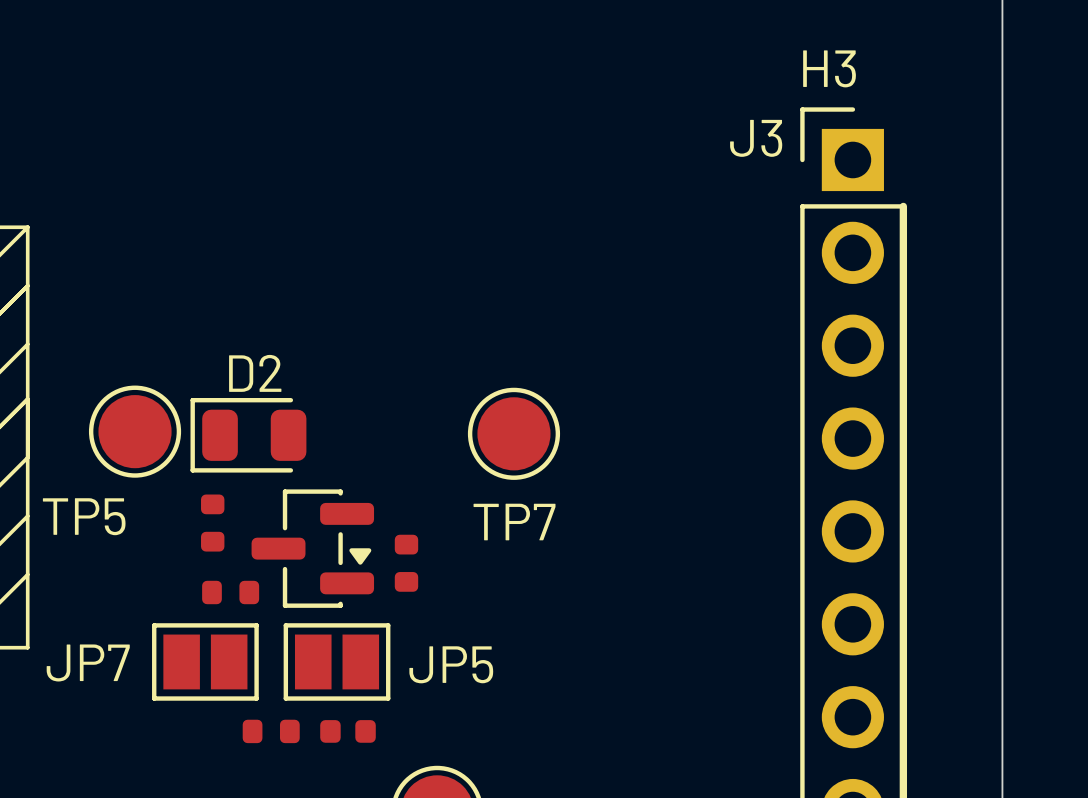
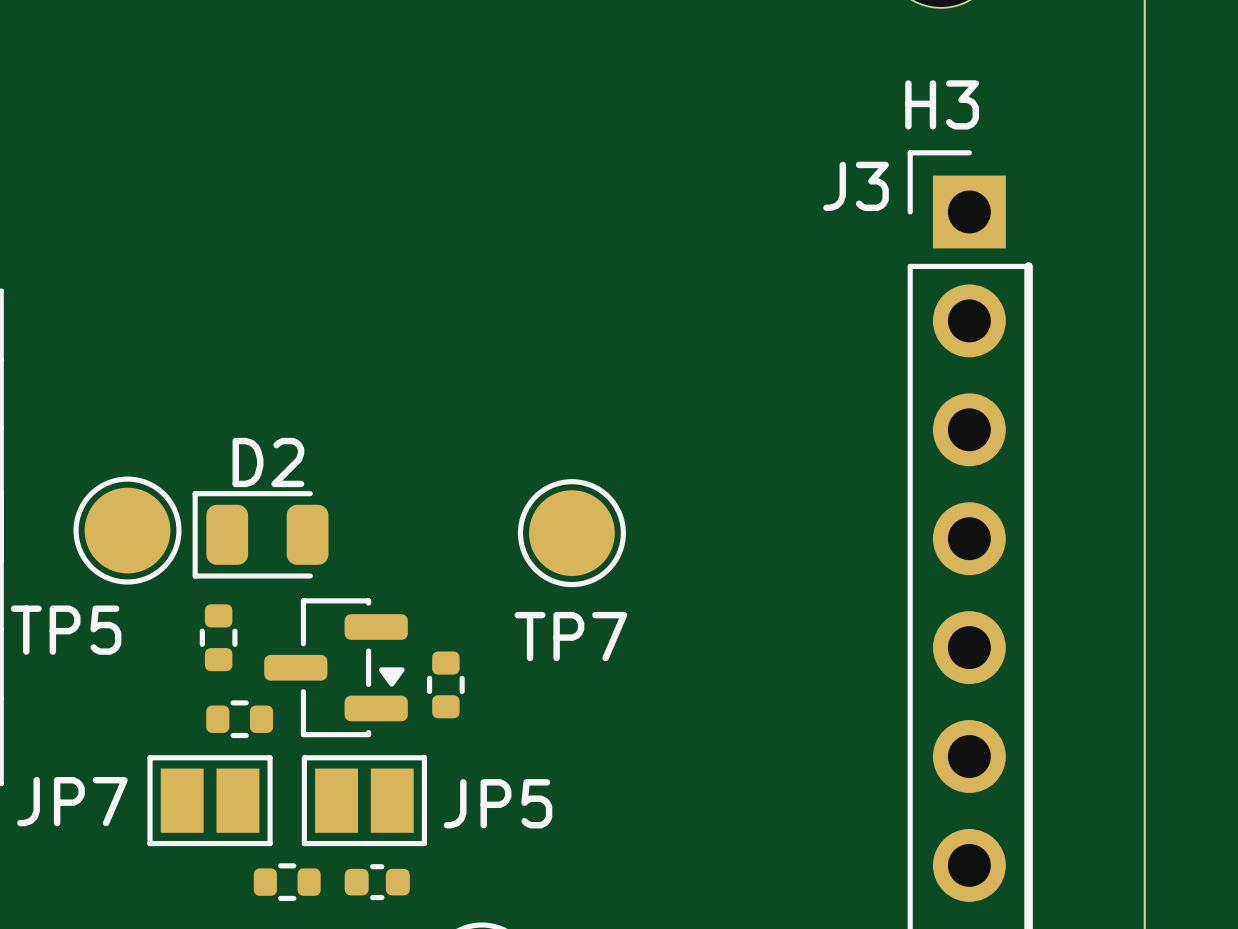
part footprint: [201, 494, 225, 552] -> [199, 604, 238, 672]
part footprint: [394, 534, 419, 592] -> [427, 651, 465, 719]
part footprint: [202, 580, 260, 605] -> [206, 700, 274, 739]
part footprint: [242, 719, 300, 744] -> [253, 863, 321, 902]
part footprint: [320, 720, 376, 743] -> [344, 864, 410, 901]

